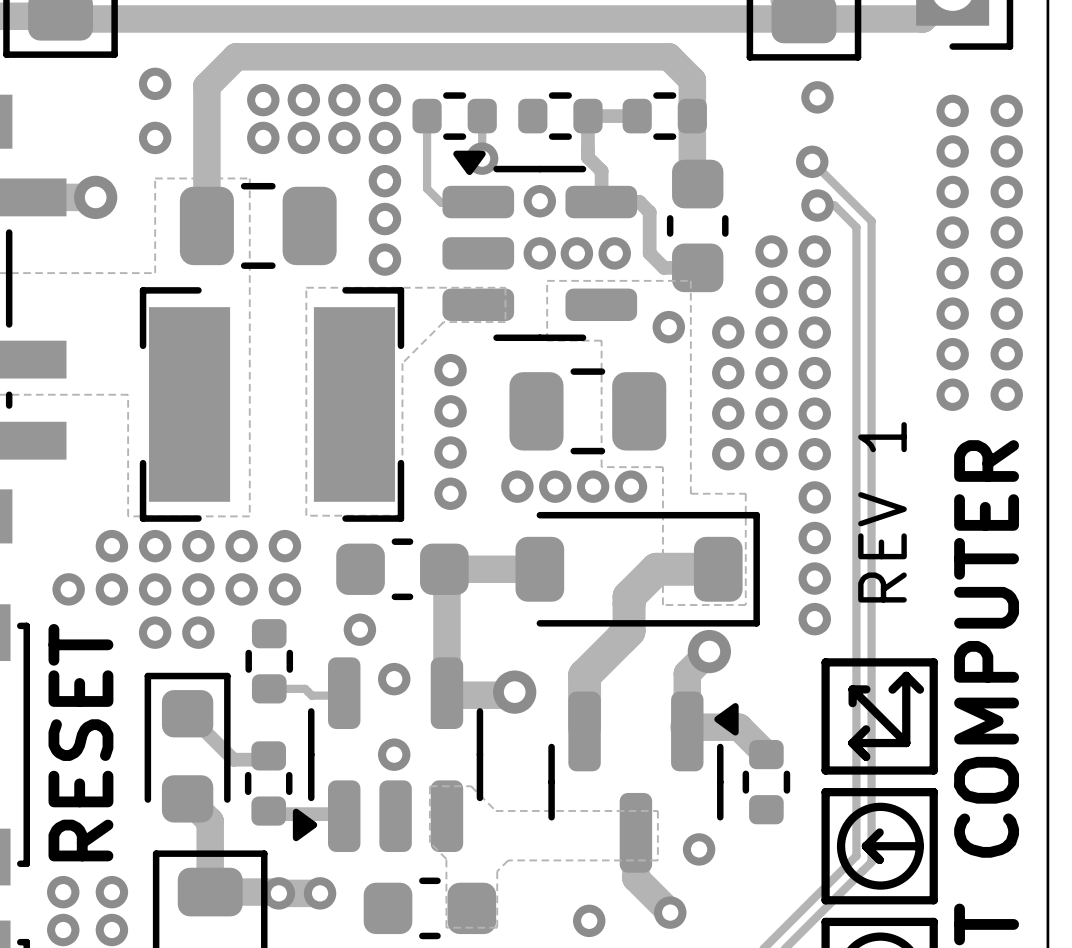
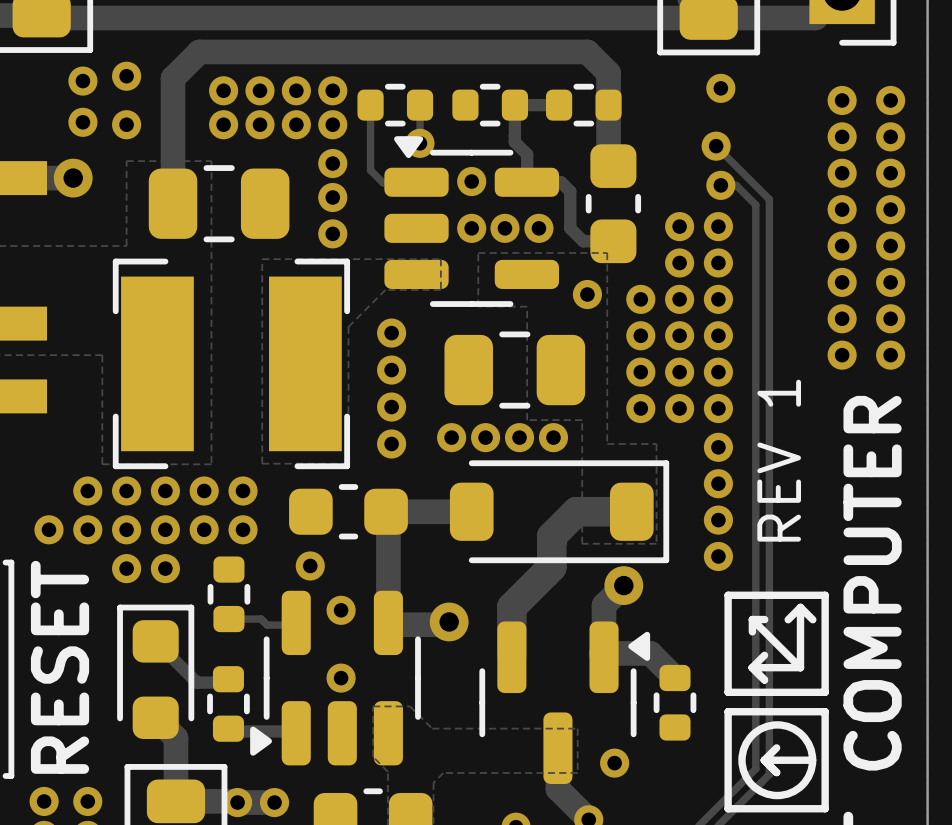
via: none -> (82, 81)
via: none -> (82, 122)

